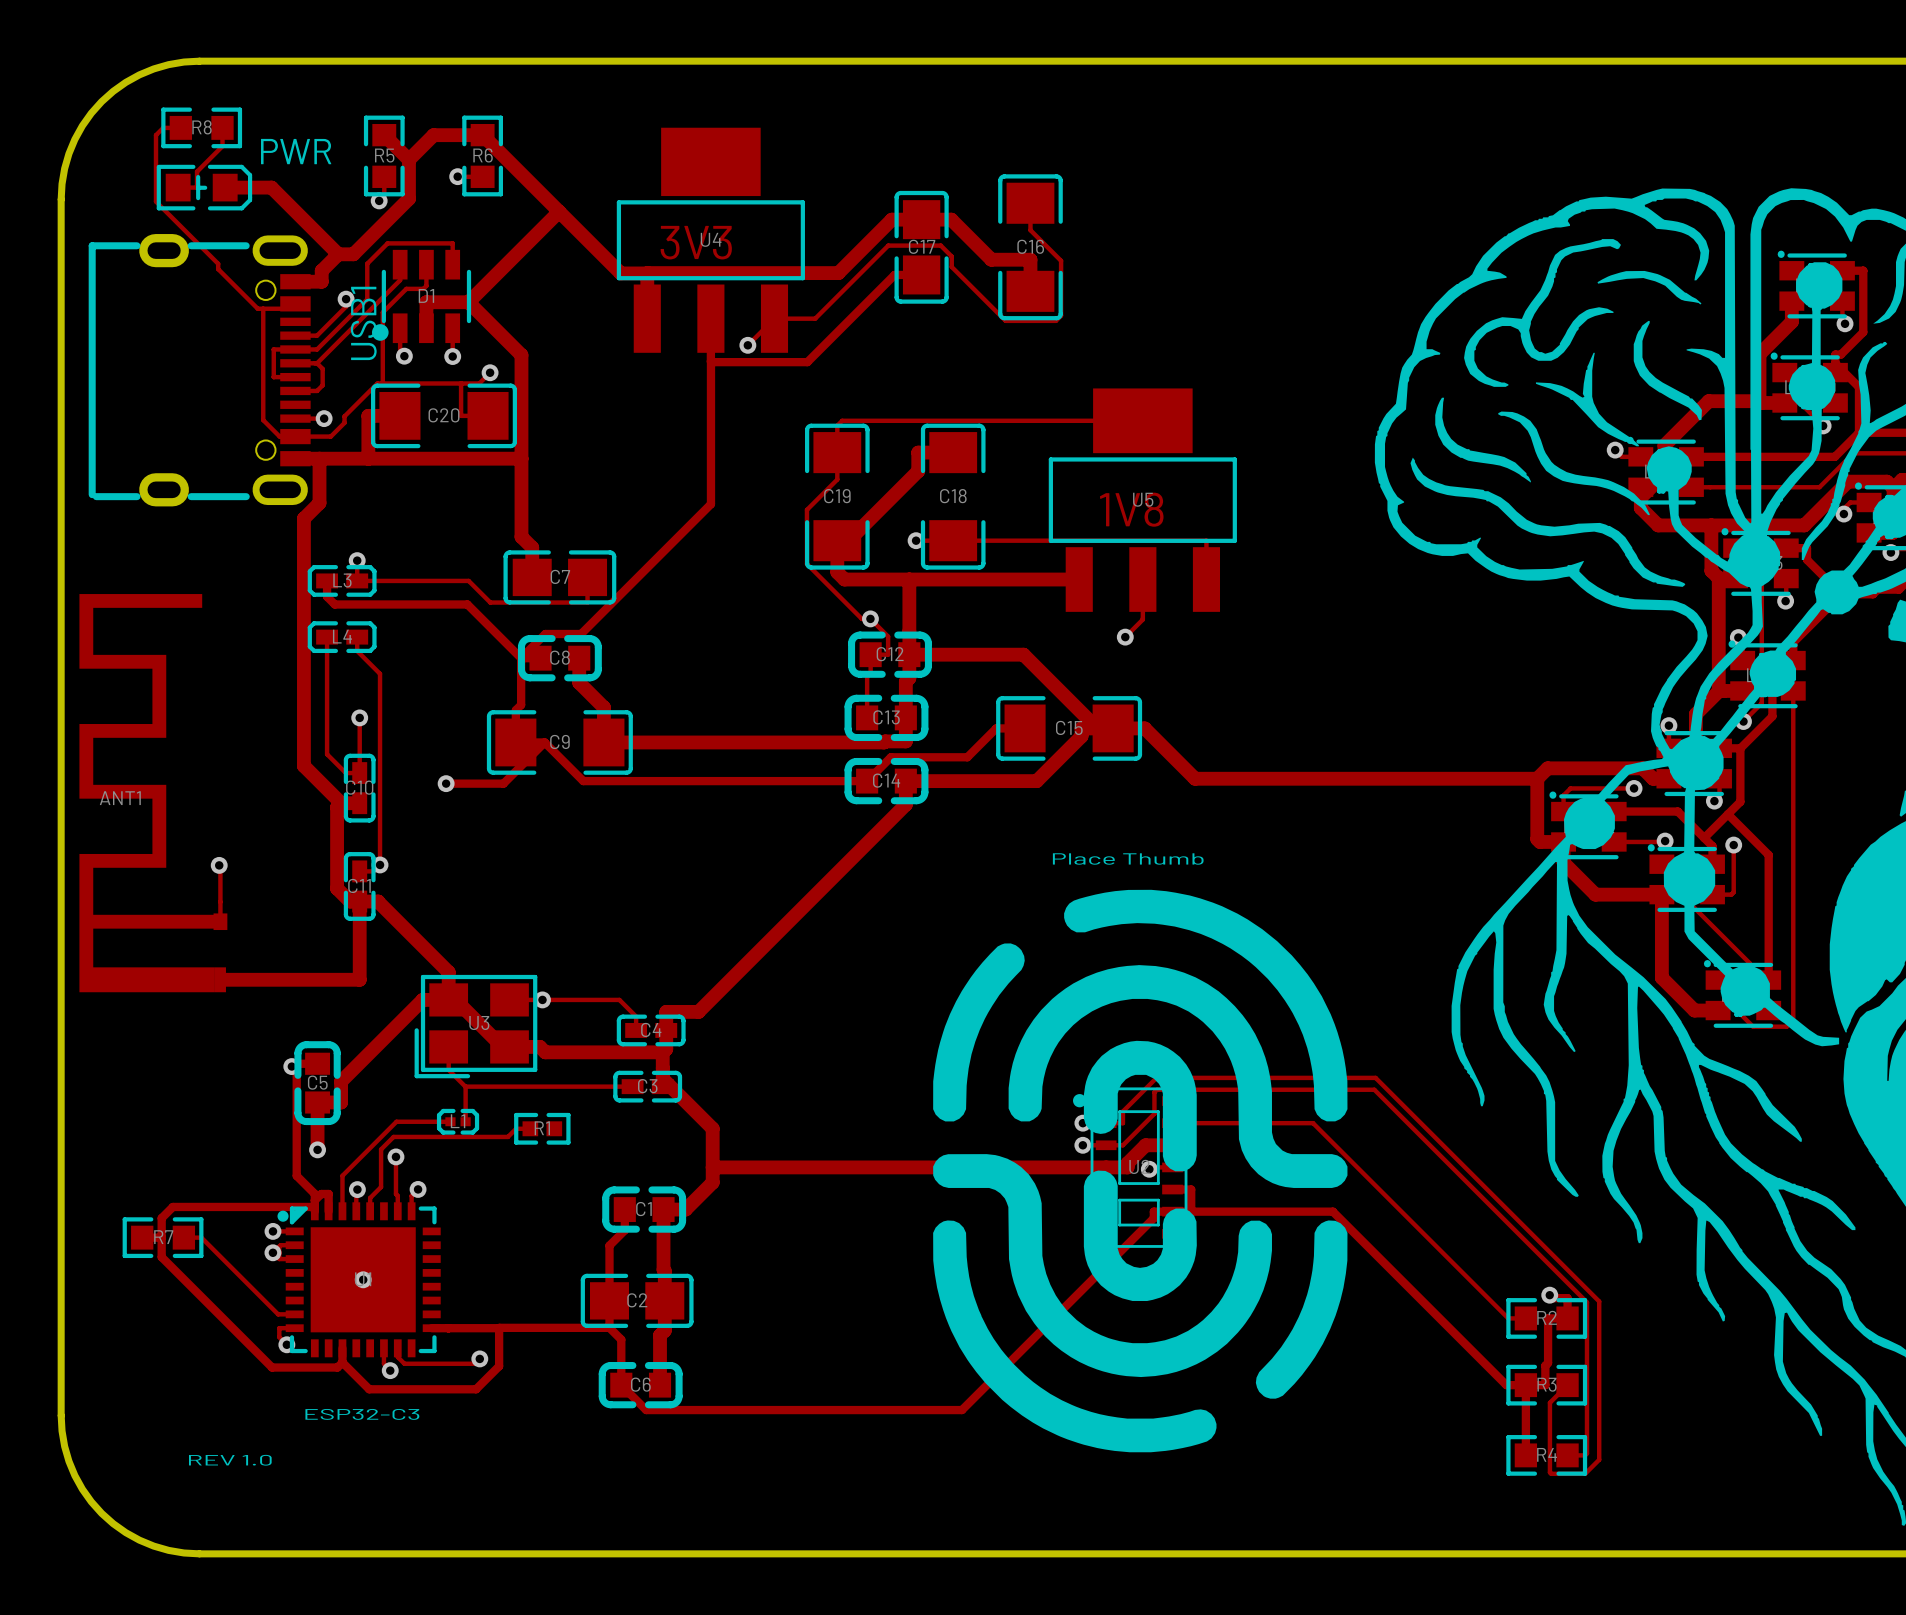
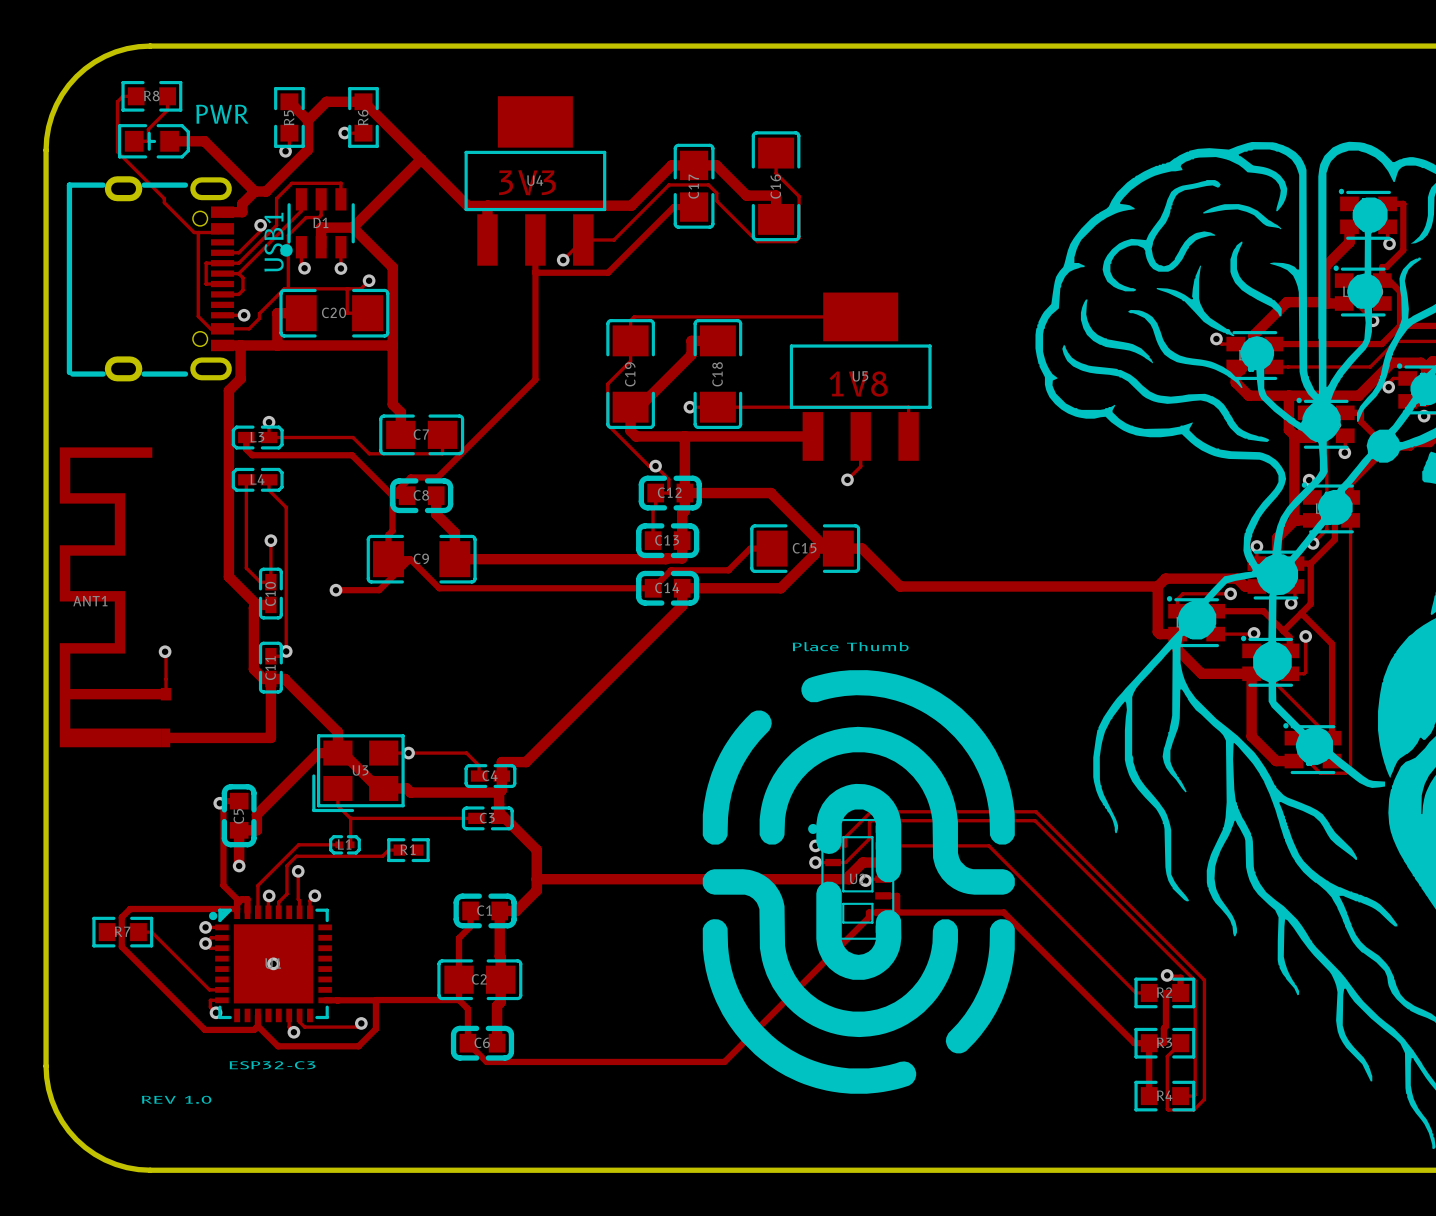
R5 name rotation: 0° (384, 155) -> 90° counterclockwise (289, 117)
R6 name rotation: 0° (483, 155) -> 90° counterclockwise (363, 117)
C17 name rotation: 0° (922, 246) -> 90° counterclockwise (693, 186)
C16 name rotation: 0° (1030, 246) -> 90° counterclockwise (775, 186)
C19 name rotation: 0° (837, 496) -> 90° counterclockwise (630, 374)
C18 name rotation: 0° (953, 496) -> 90° counterclockwise (717, 374)
C10 name rotation: 0° (359, 787) -> 90° counterclockwise (270, 593)
C11 name rotation: 0° (359, 885) -> 90° counterclockwise (270, 668)
C5 name rotation: 0° (317, 1082) -> 90° counterclockwise (238, 816)

